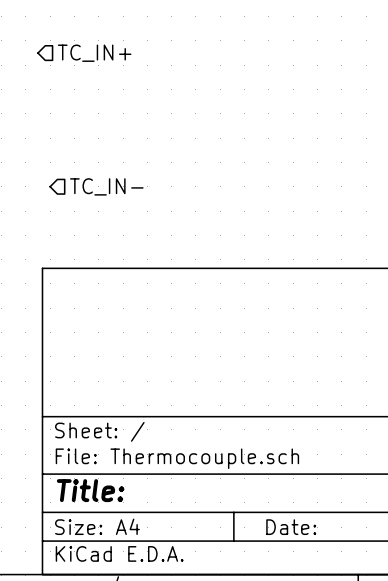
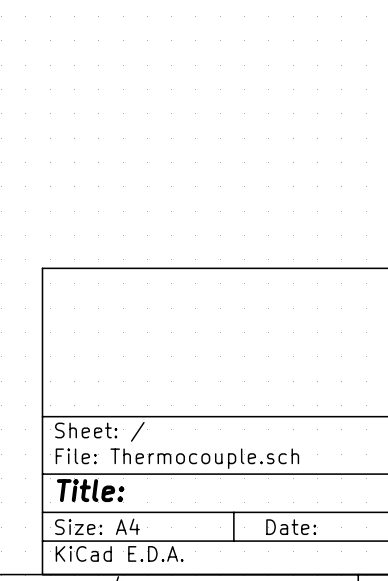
hierarchical label: TC_IN+ (94, 53) -> none
hierarchical label: TC_IN- (106, 186) -> none

